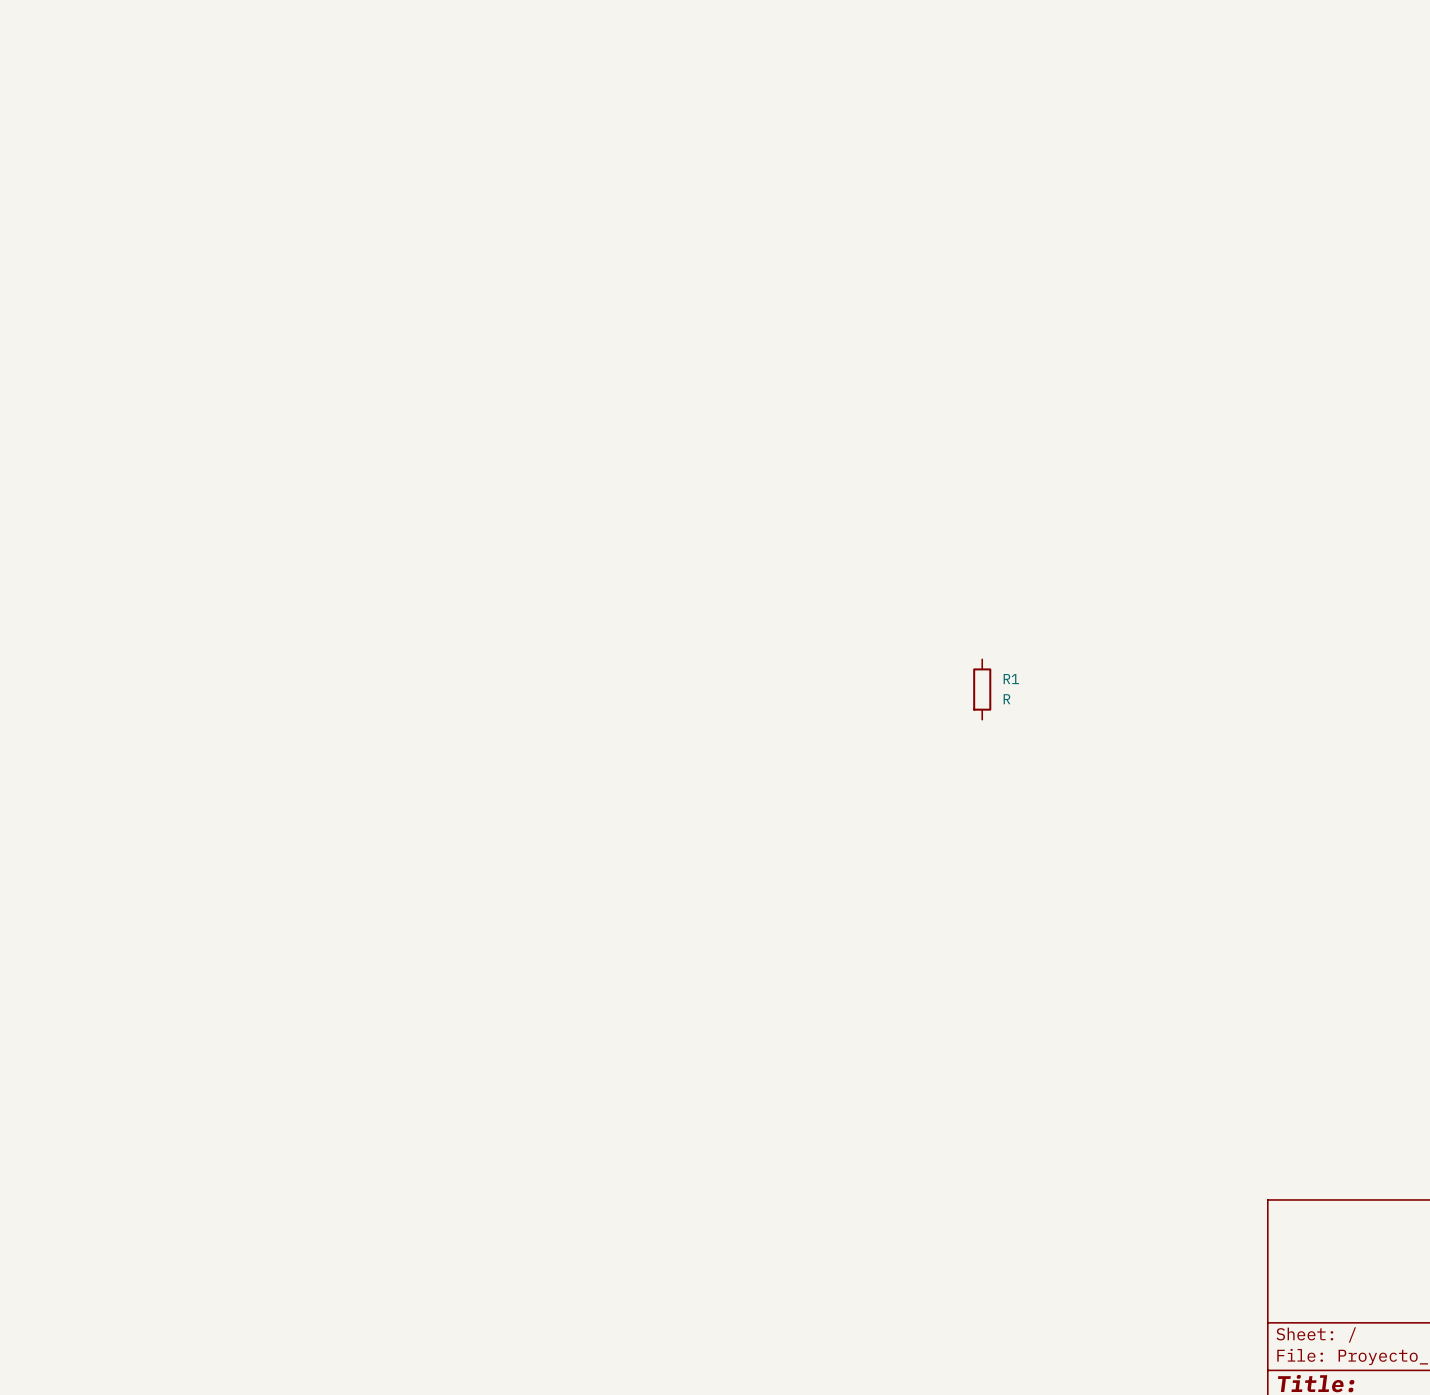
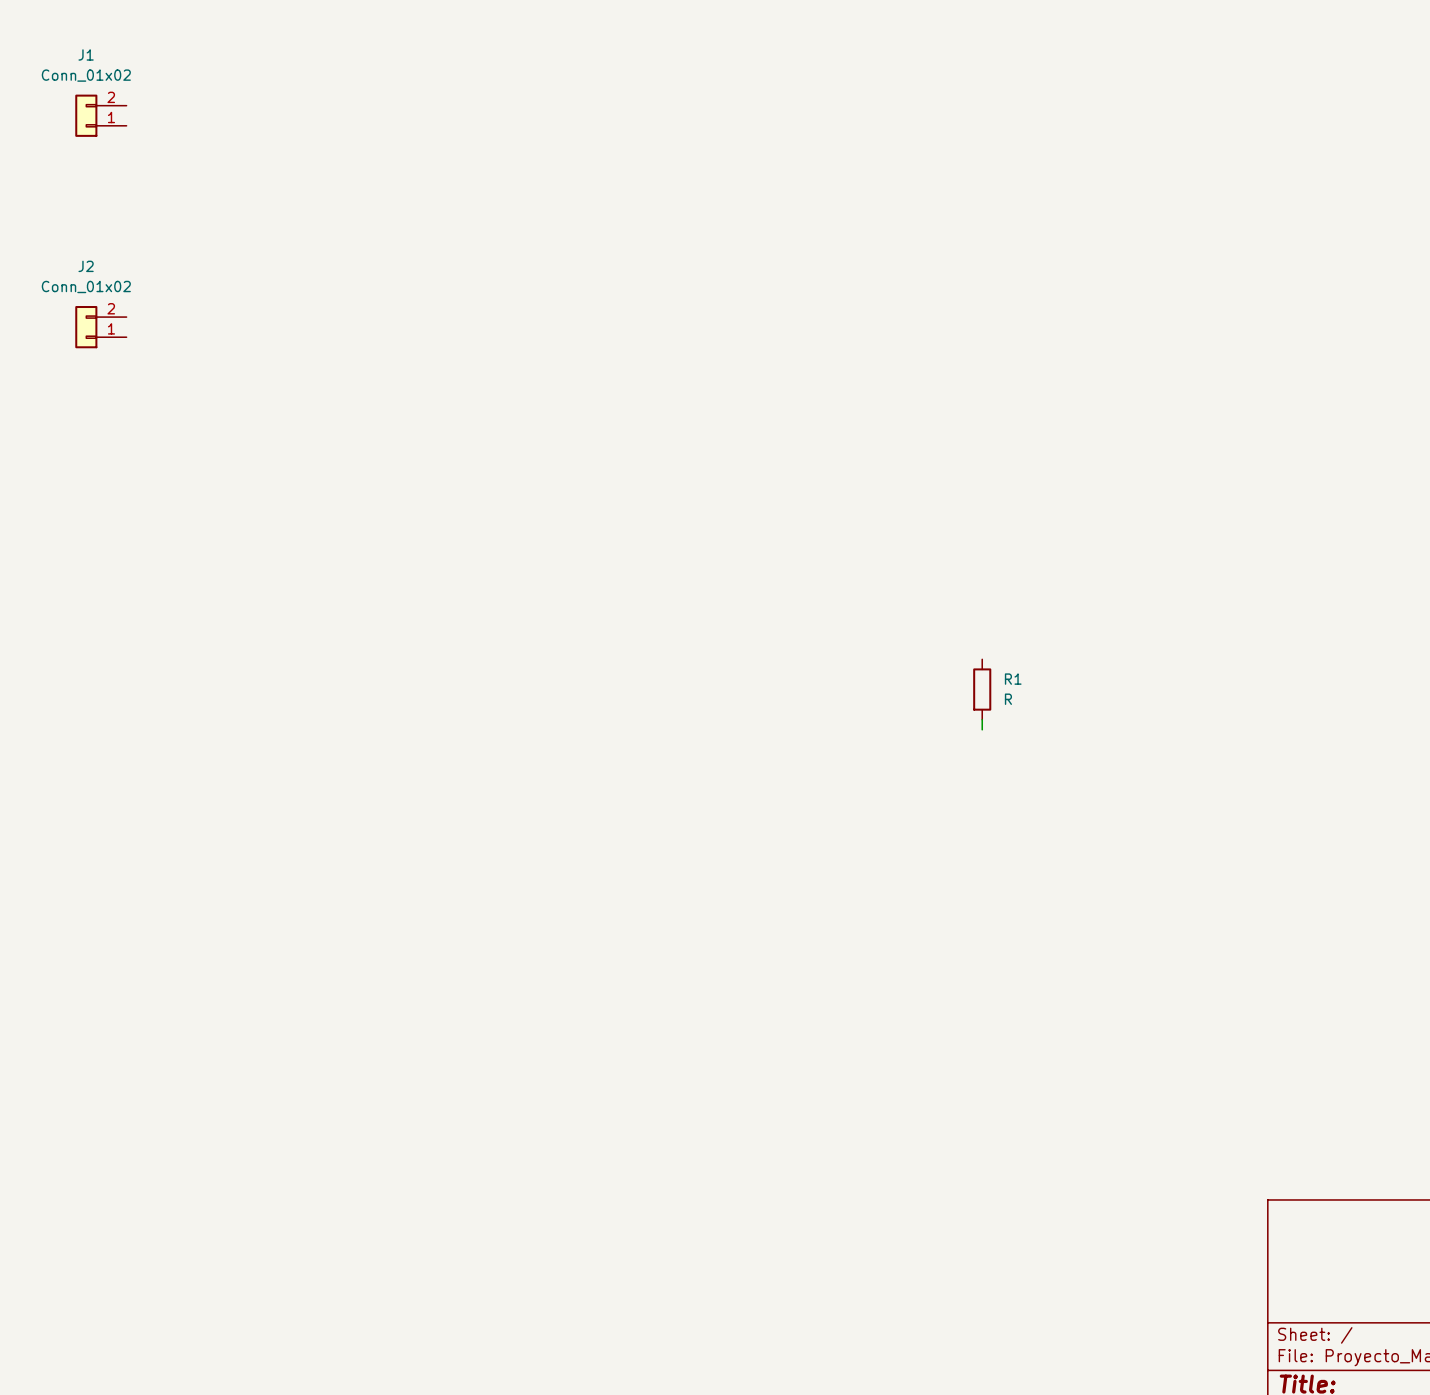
J1: none -> Conn_01x02 (100, 115)
J2: none -> Conn_01x02 (100, 327)
wire: none -> (982, 719) (982, 729)

